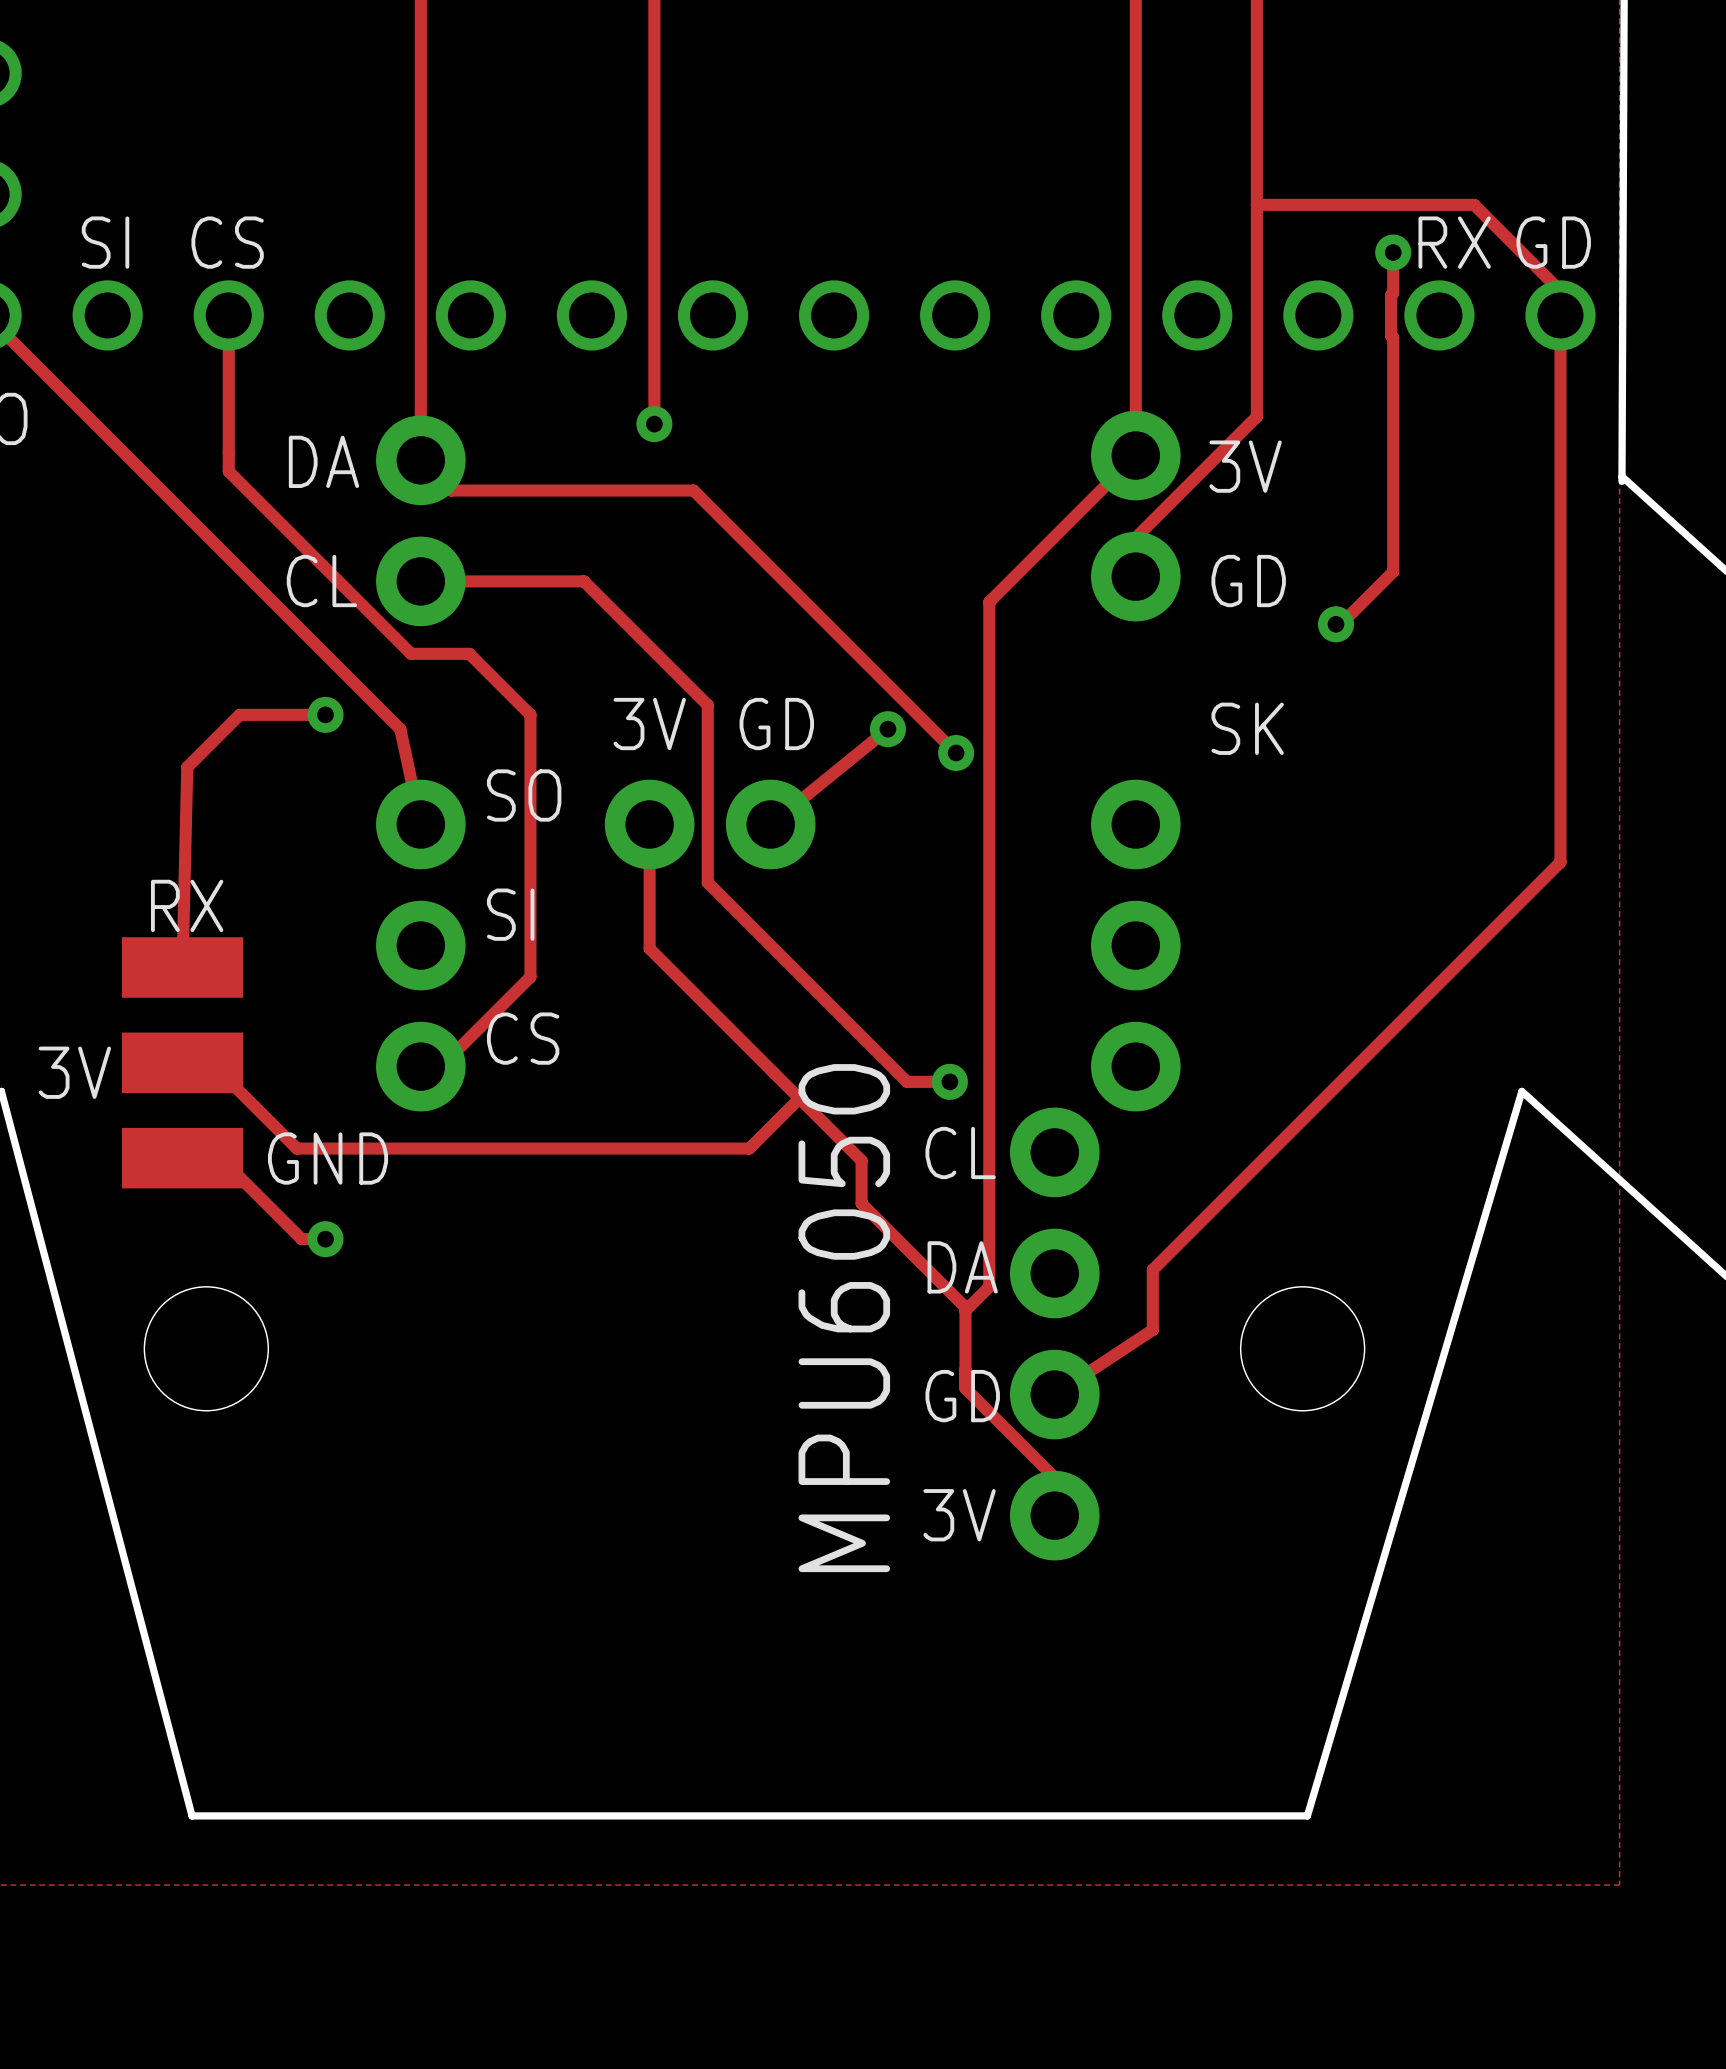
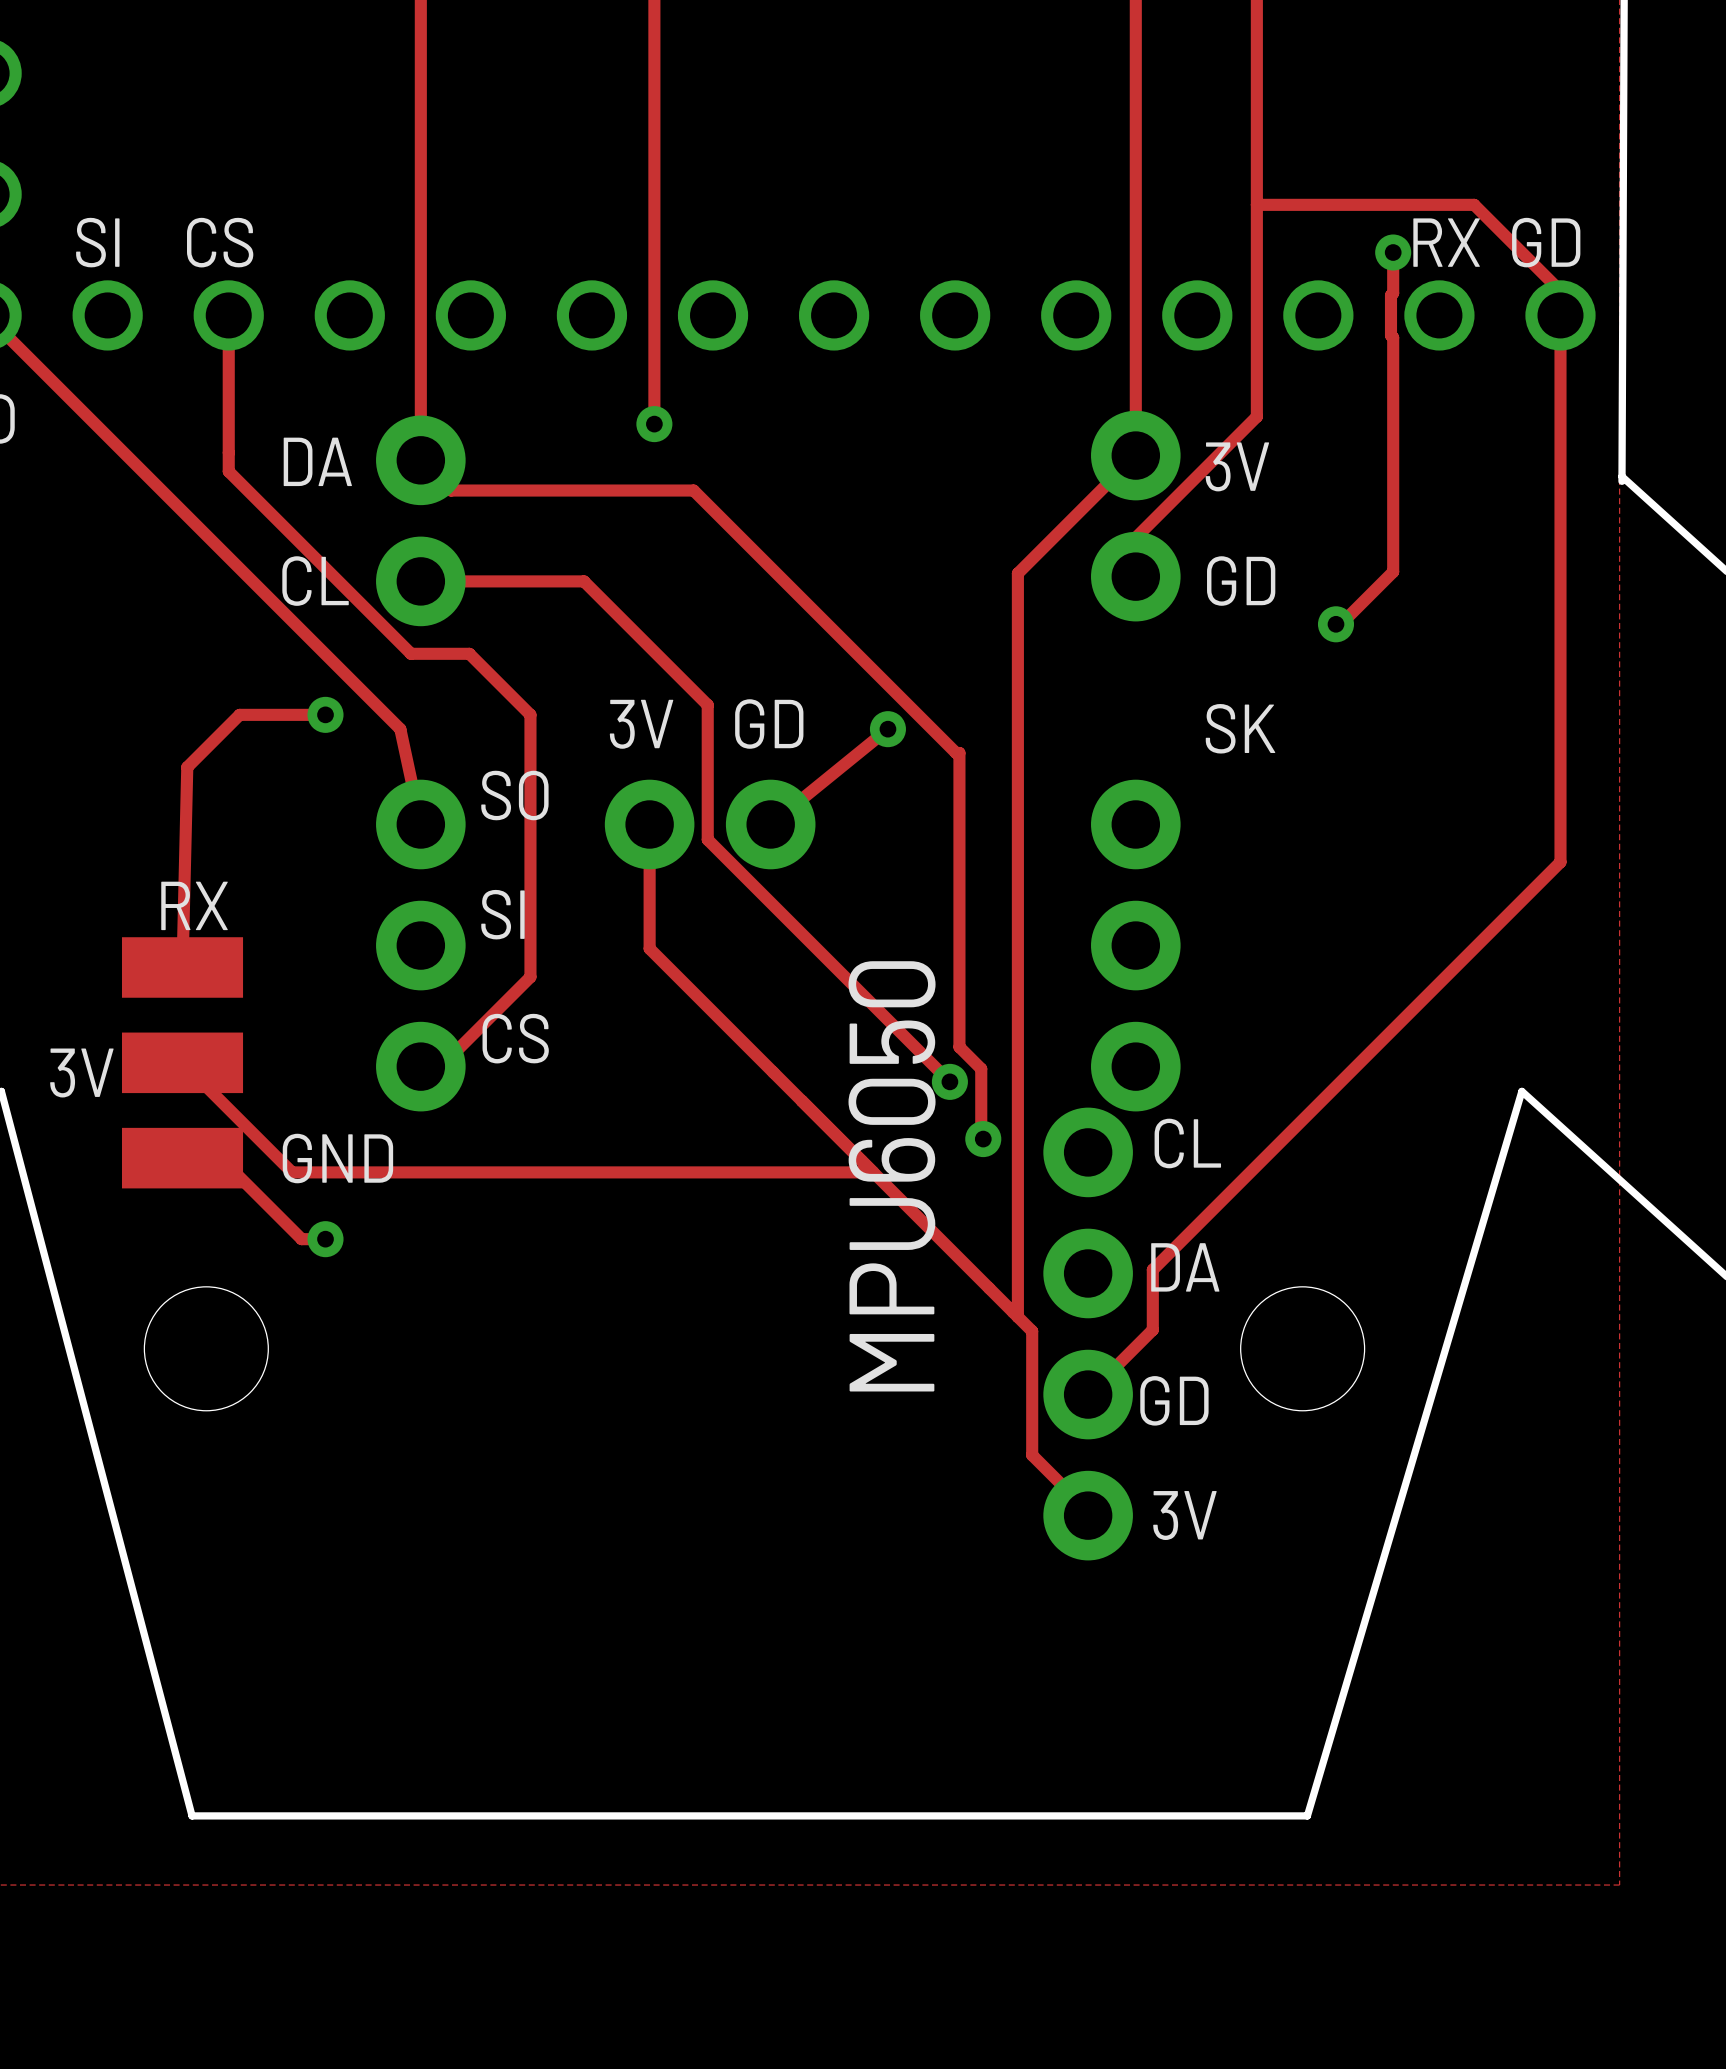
track: (1017, 573) (989, 602) (989, 1286) (965, 1310) -> (1017, 573) (1017, 1316)
via: (956, 752) -> none
track: none -> (959, 752) (959, 1047) (981, 1068) (981, 1127) (983, 1129) (983, 1139)
track: (707, 839) (707, 882) (907, 1081) (949, 1081) -> (707, 839) (949, 1081)
track: (182, 1062) (211, 1062) (296, 1148) (749, 1148) (797, 1100) (801, 1100) -> (182, 1062) (292, 1172) (873, 1172)
via: none -> (983, 1139)
text position: CL (960, 1152) -> CL (1187, 1143)
track: (861, 1160) (861, 1203) (965, 1307) (965, 1388) (1032, 1455) -> (861, 1160) (1032, 1331) (1032, 1455)
text position: DA (962, 1267) -> DA (1185, 1267)
text position: MPU6050 (844, 1318) -> MPU6050 (892, 1176)
track: (1152, 1329) (1054, 1394) -> (1152, 1329) (1088, 1394)
part position: (1054, 1334) -> (1088, 1334)
text position: GD (962, 1396) -> GD (1174, 1400)
text position: 3V (959, 1515) -> 3V (1185, 1515)

